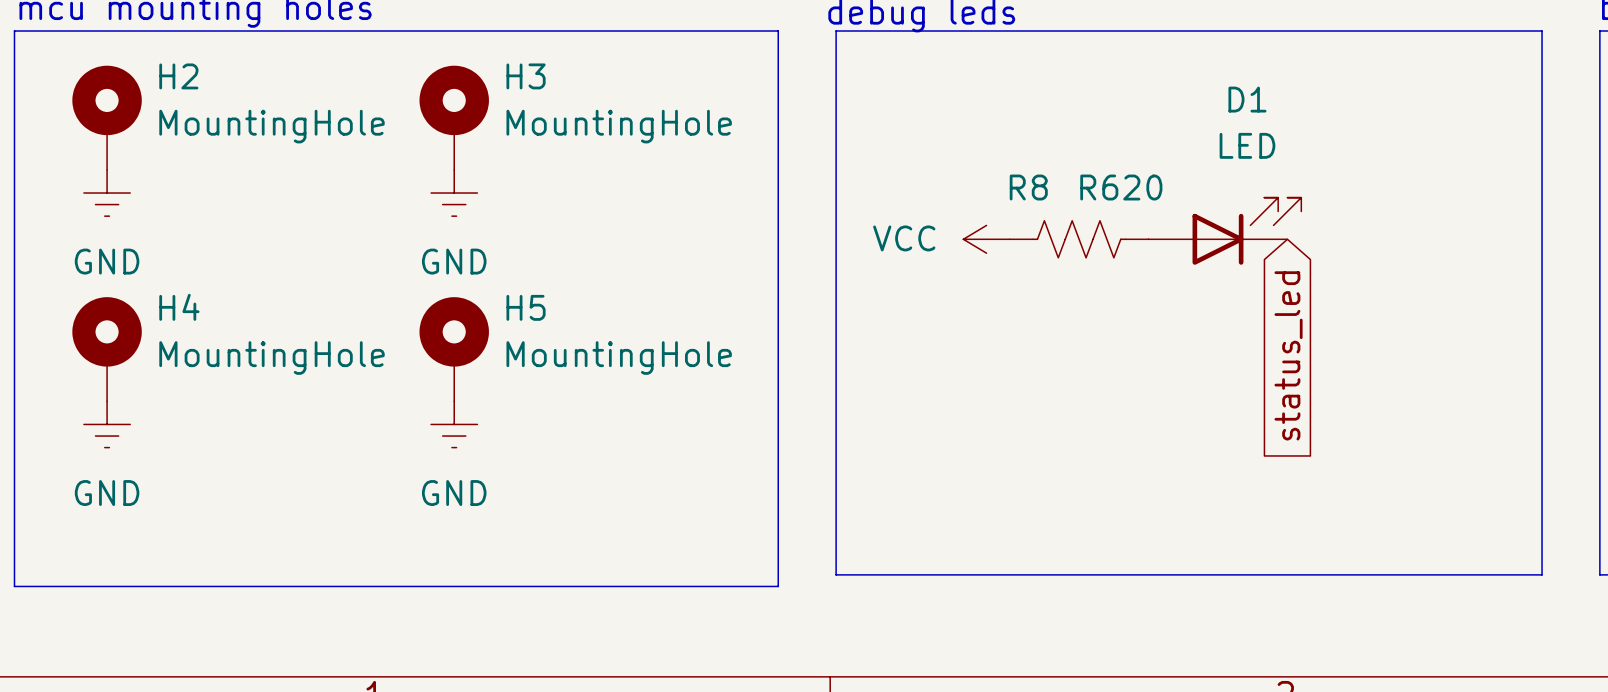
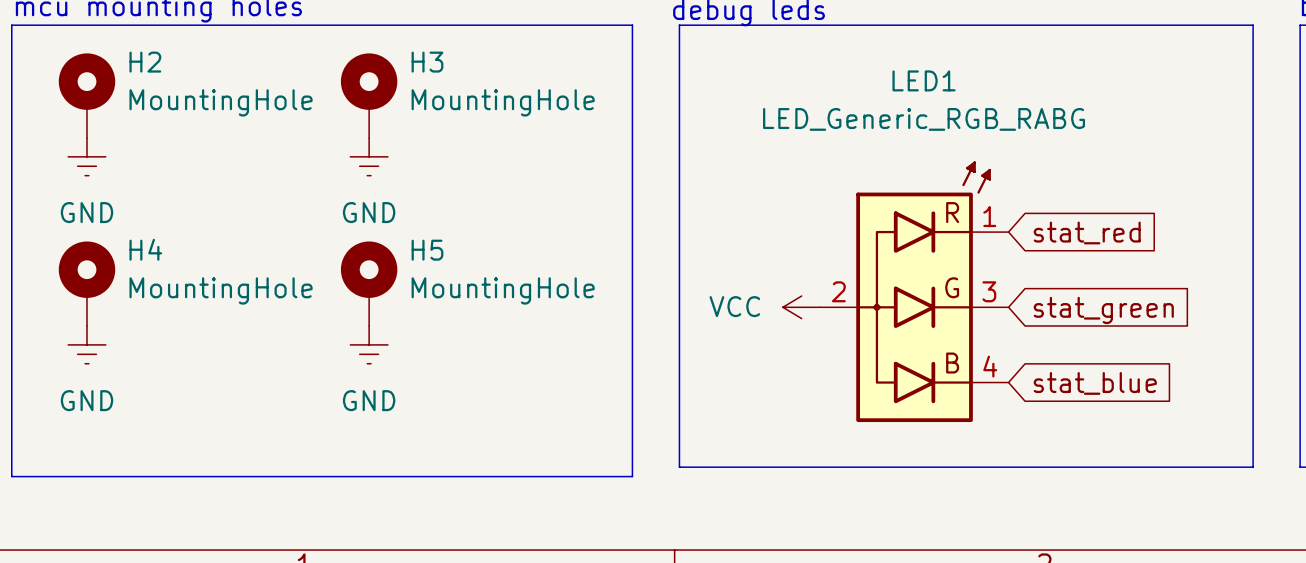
D1: LED (1224, 231) -> none
power symbol position: VCC (986, 239) -> VCC (801, 307)
R8: R620 (1079, 239) -> none
global label: status_led (1288, 355) -> stat_red (1087, 232)
LED1: none -> LED_Generic_RGB_RABG (914, 291)
global label: none -> stat_green (1103, 310)
global label: none -> stat_blue (1095, 383)

